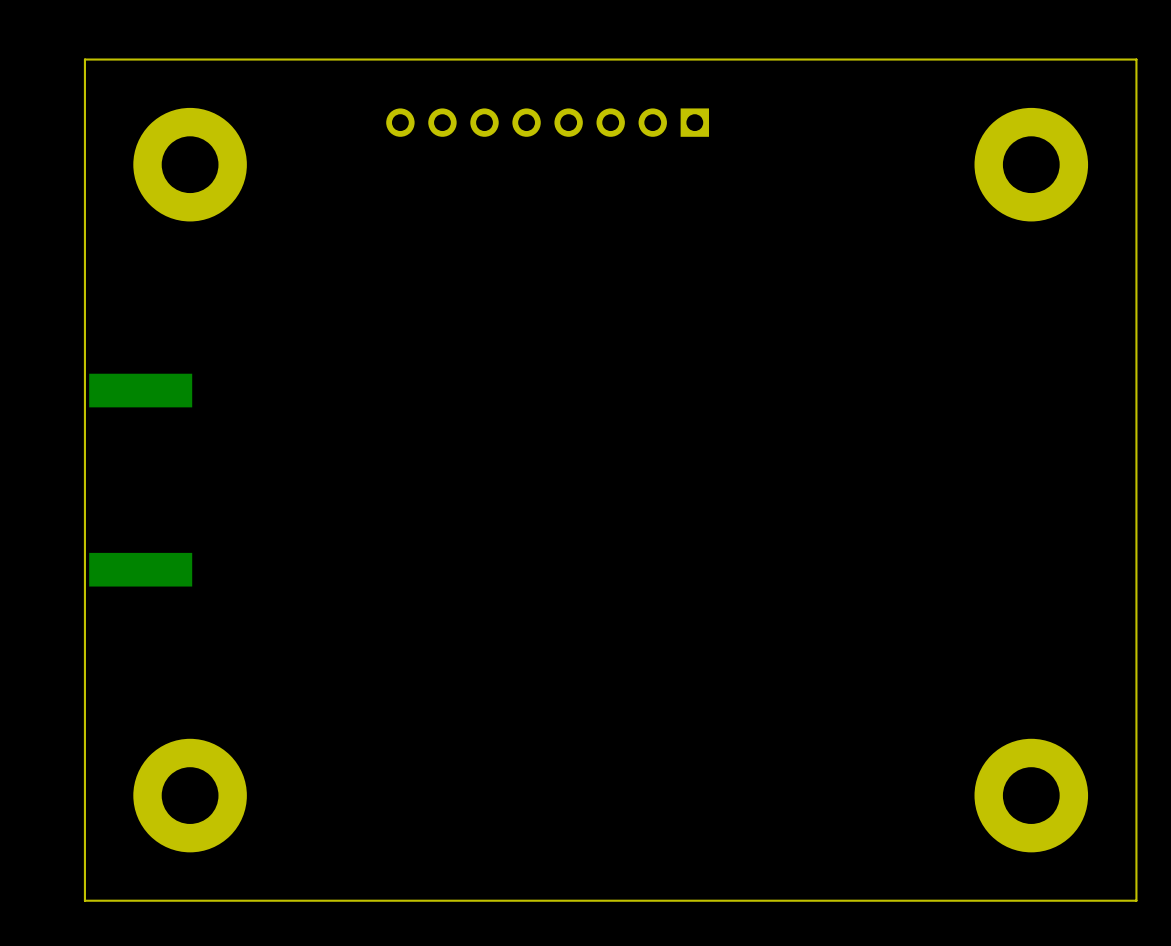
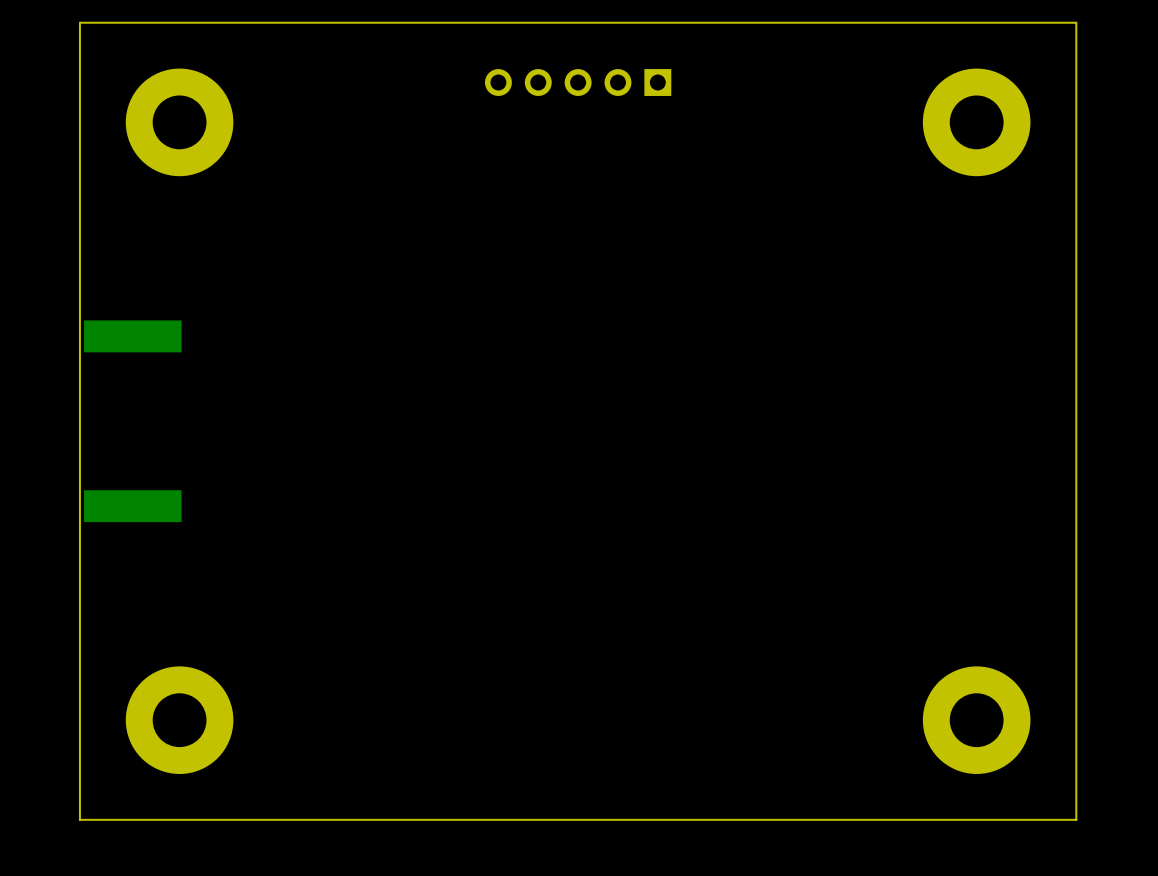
part: (547, 122) -> none

